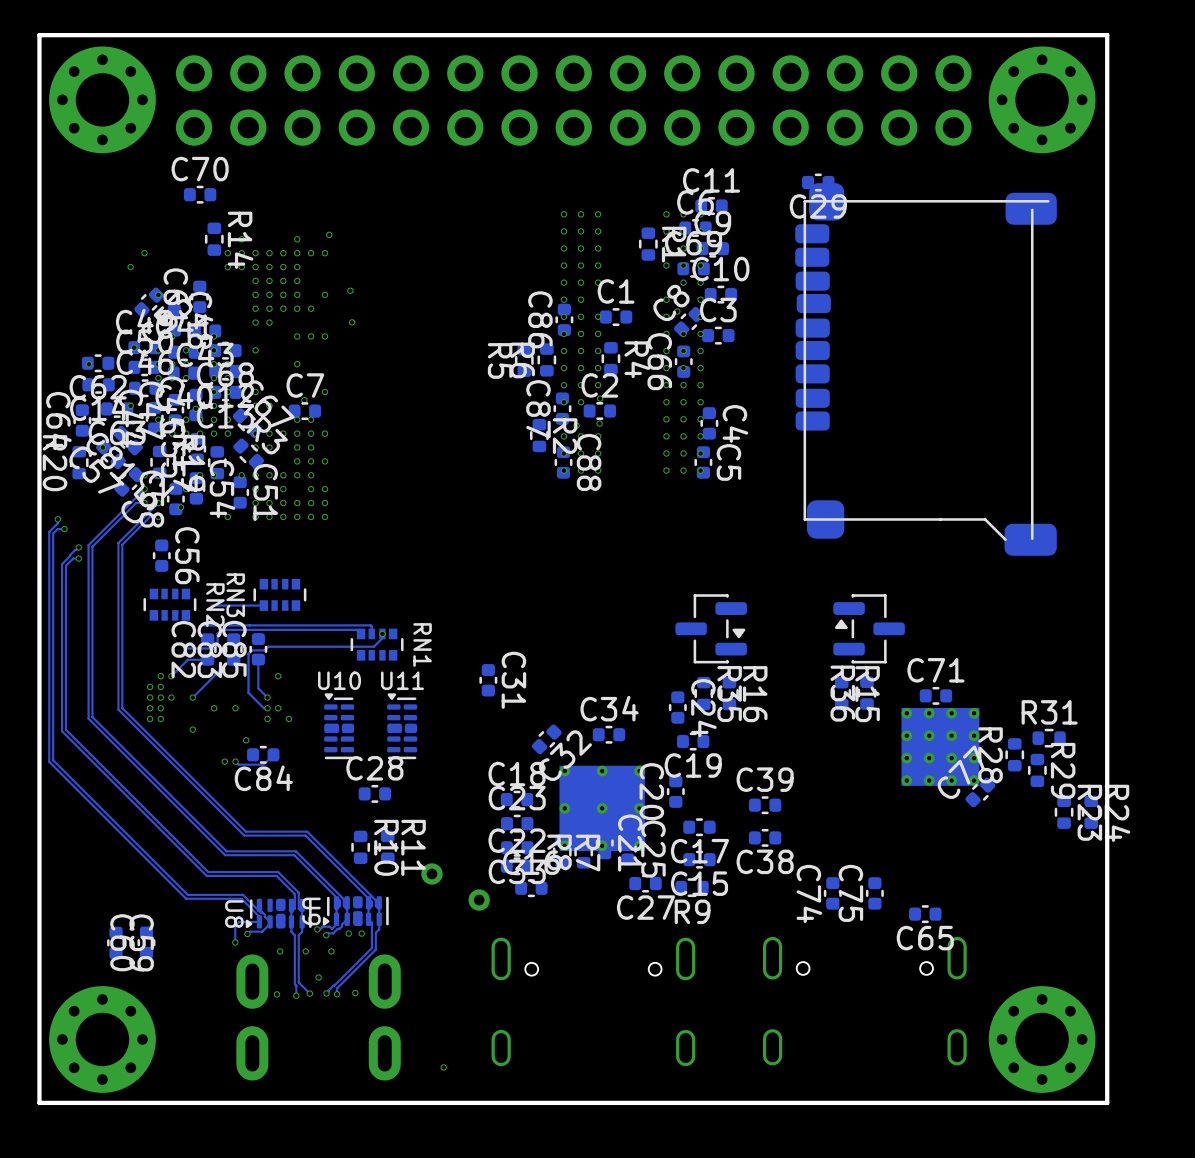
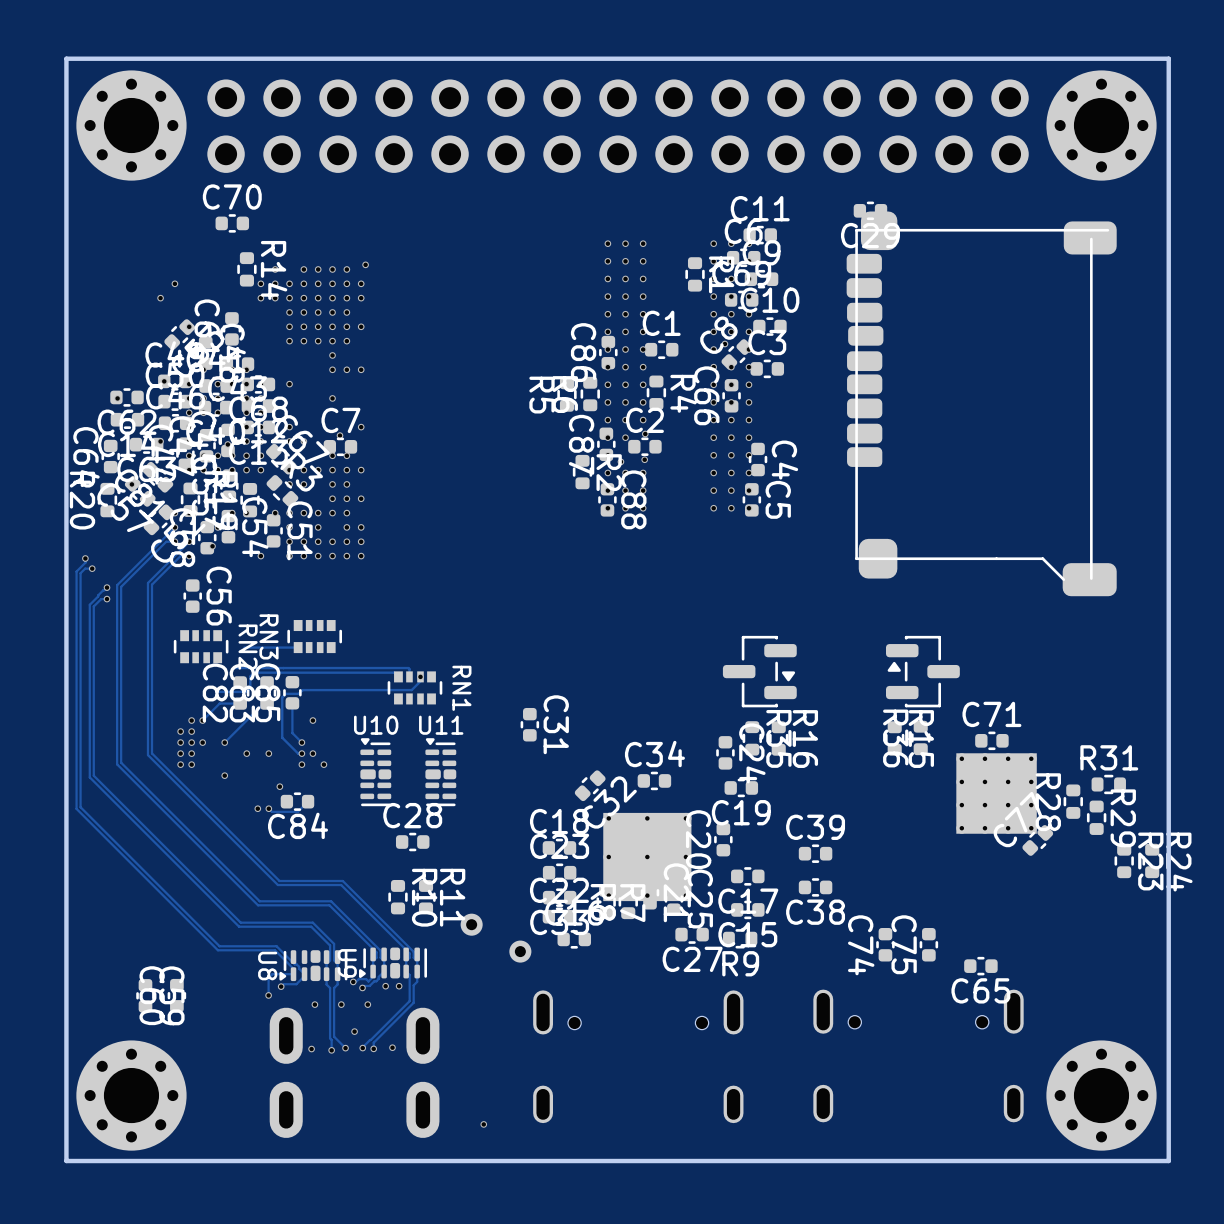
via: none -> (303, 269)
via: none -> (318, 269)
via: none -> (346, 269)
via: none -> (346, 298)
via: none -> (361, 298)
via: none -> (346, 312)
via: none -> (713, 314)
via: (350, 290) -> none
via: none -> (346, 326)
via: none -> (643, 331)
via: none -> (731, 331)
via: (255, 322) -> none
via: (269, 322) -> none
via: none -> (332, 355)
via: (352, 322) -> none

